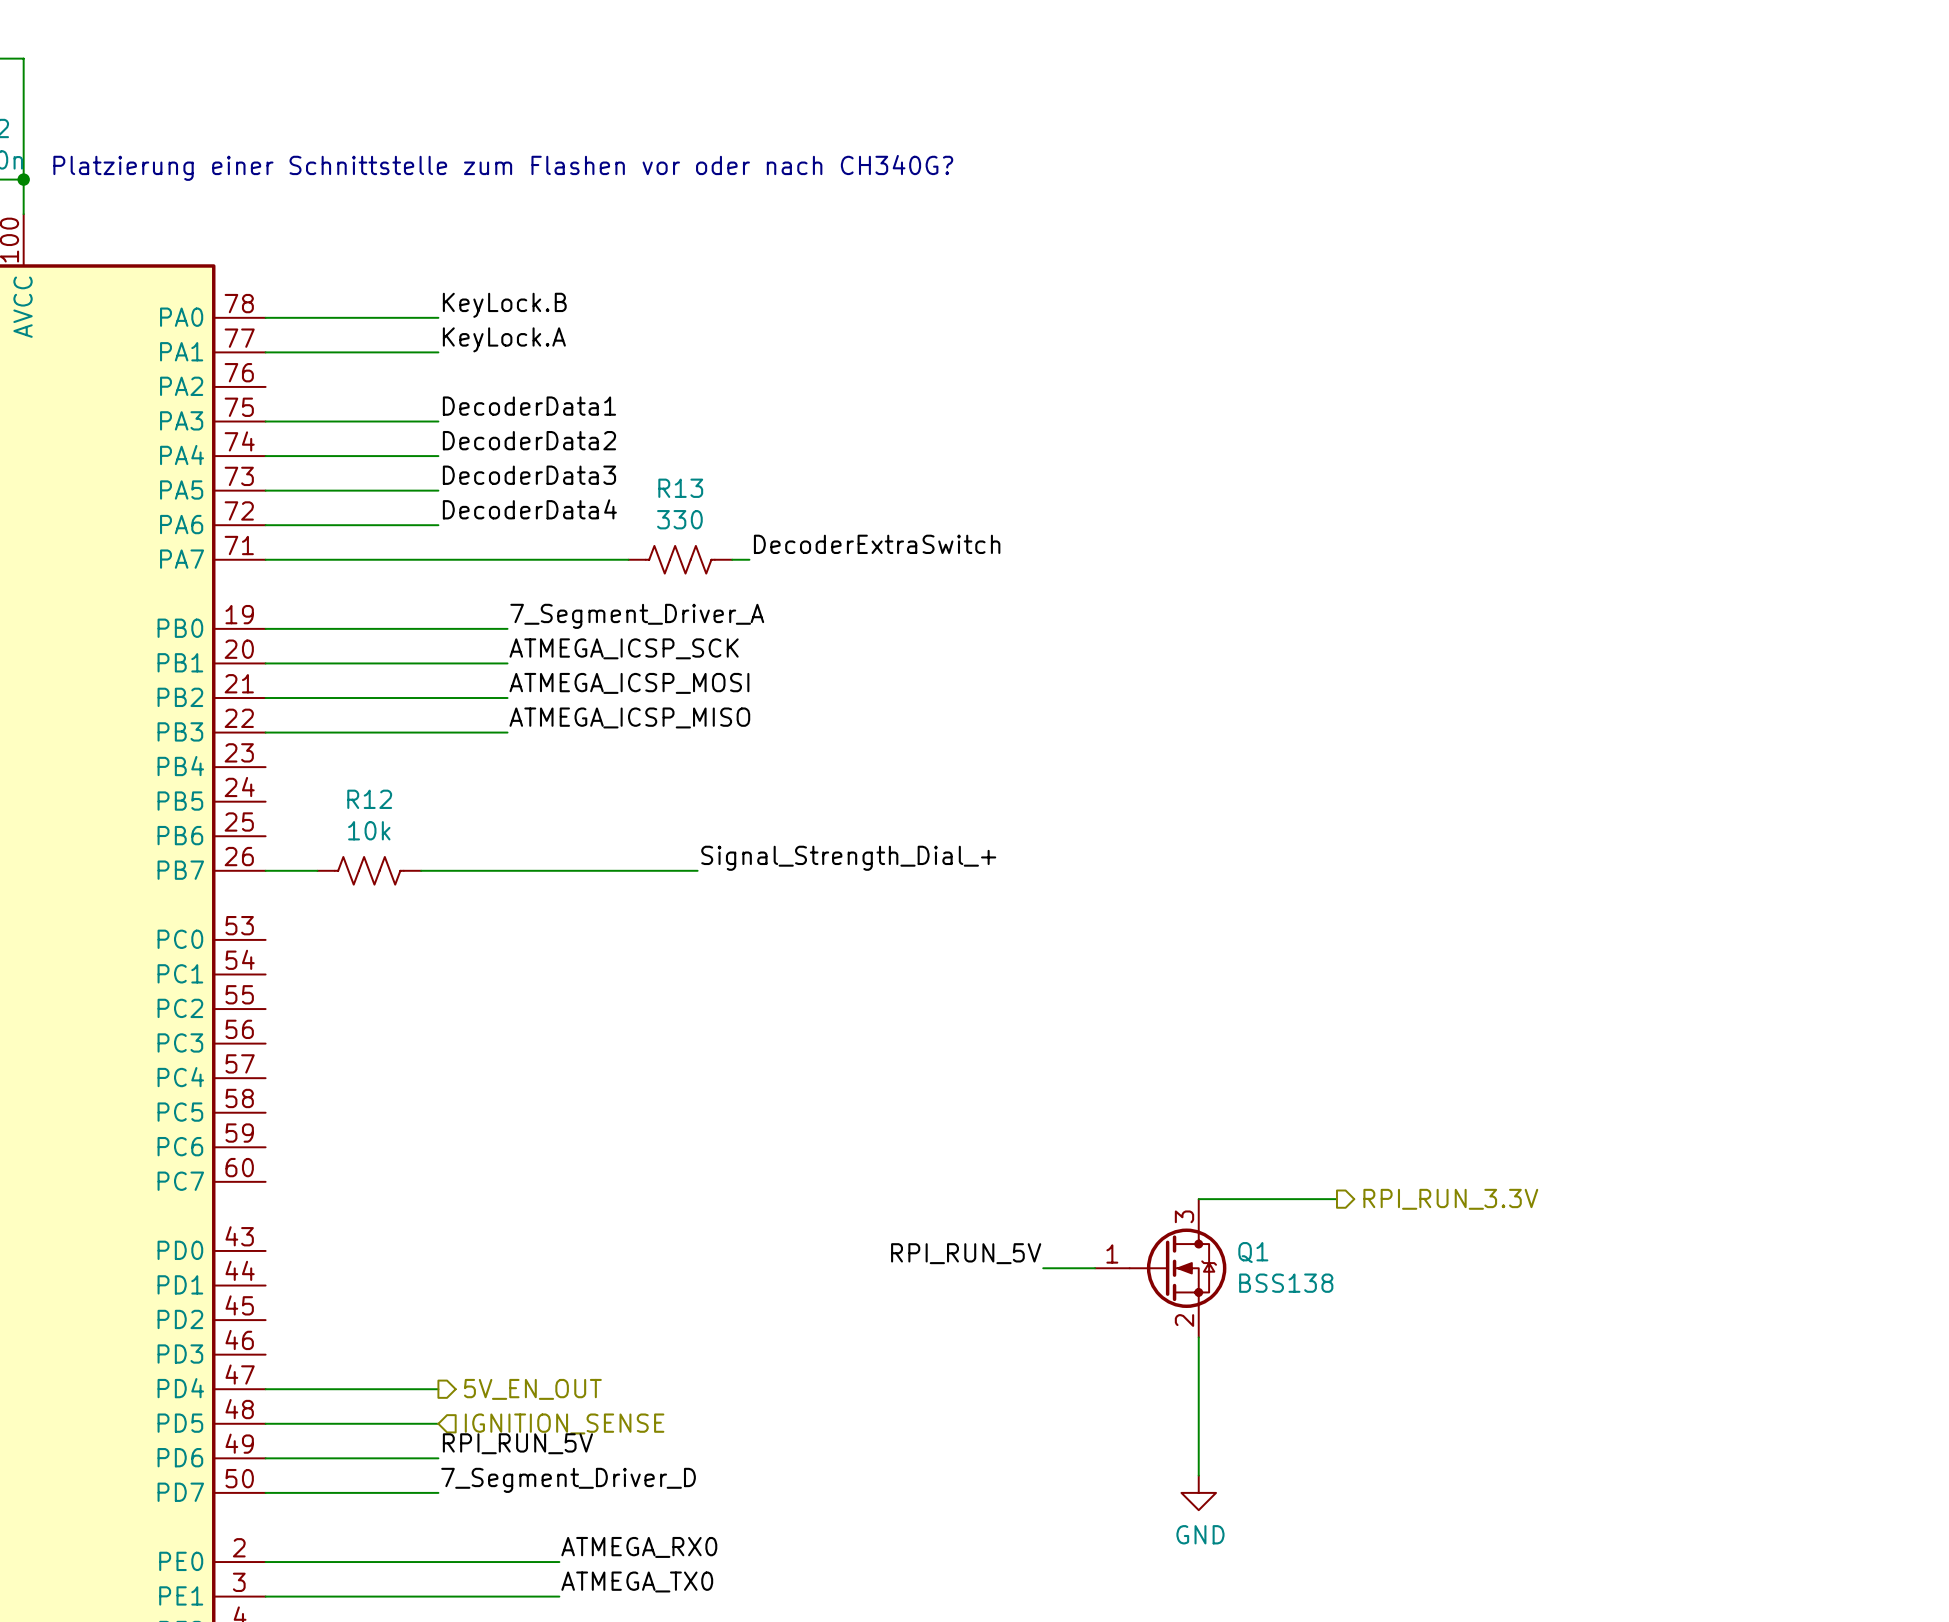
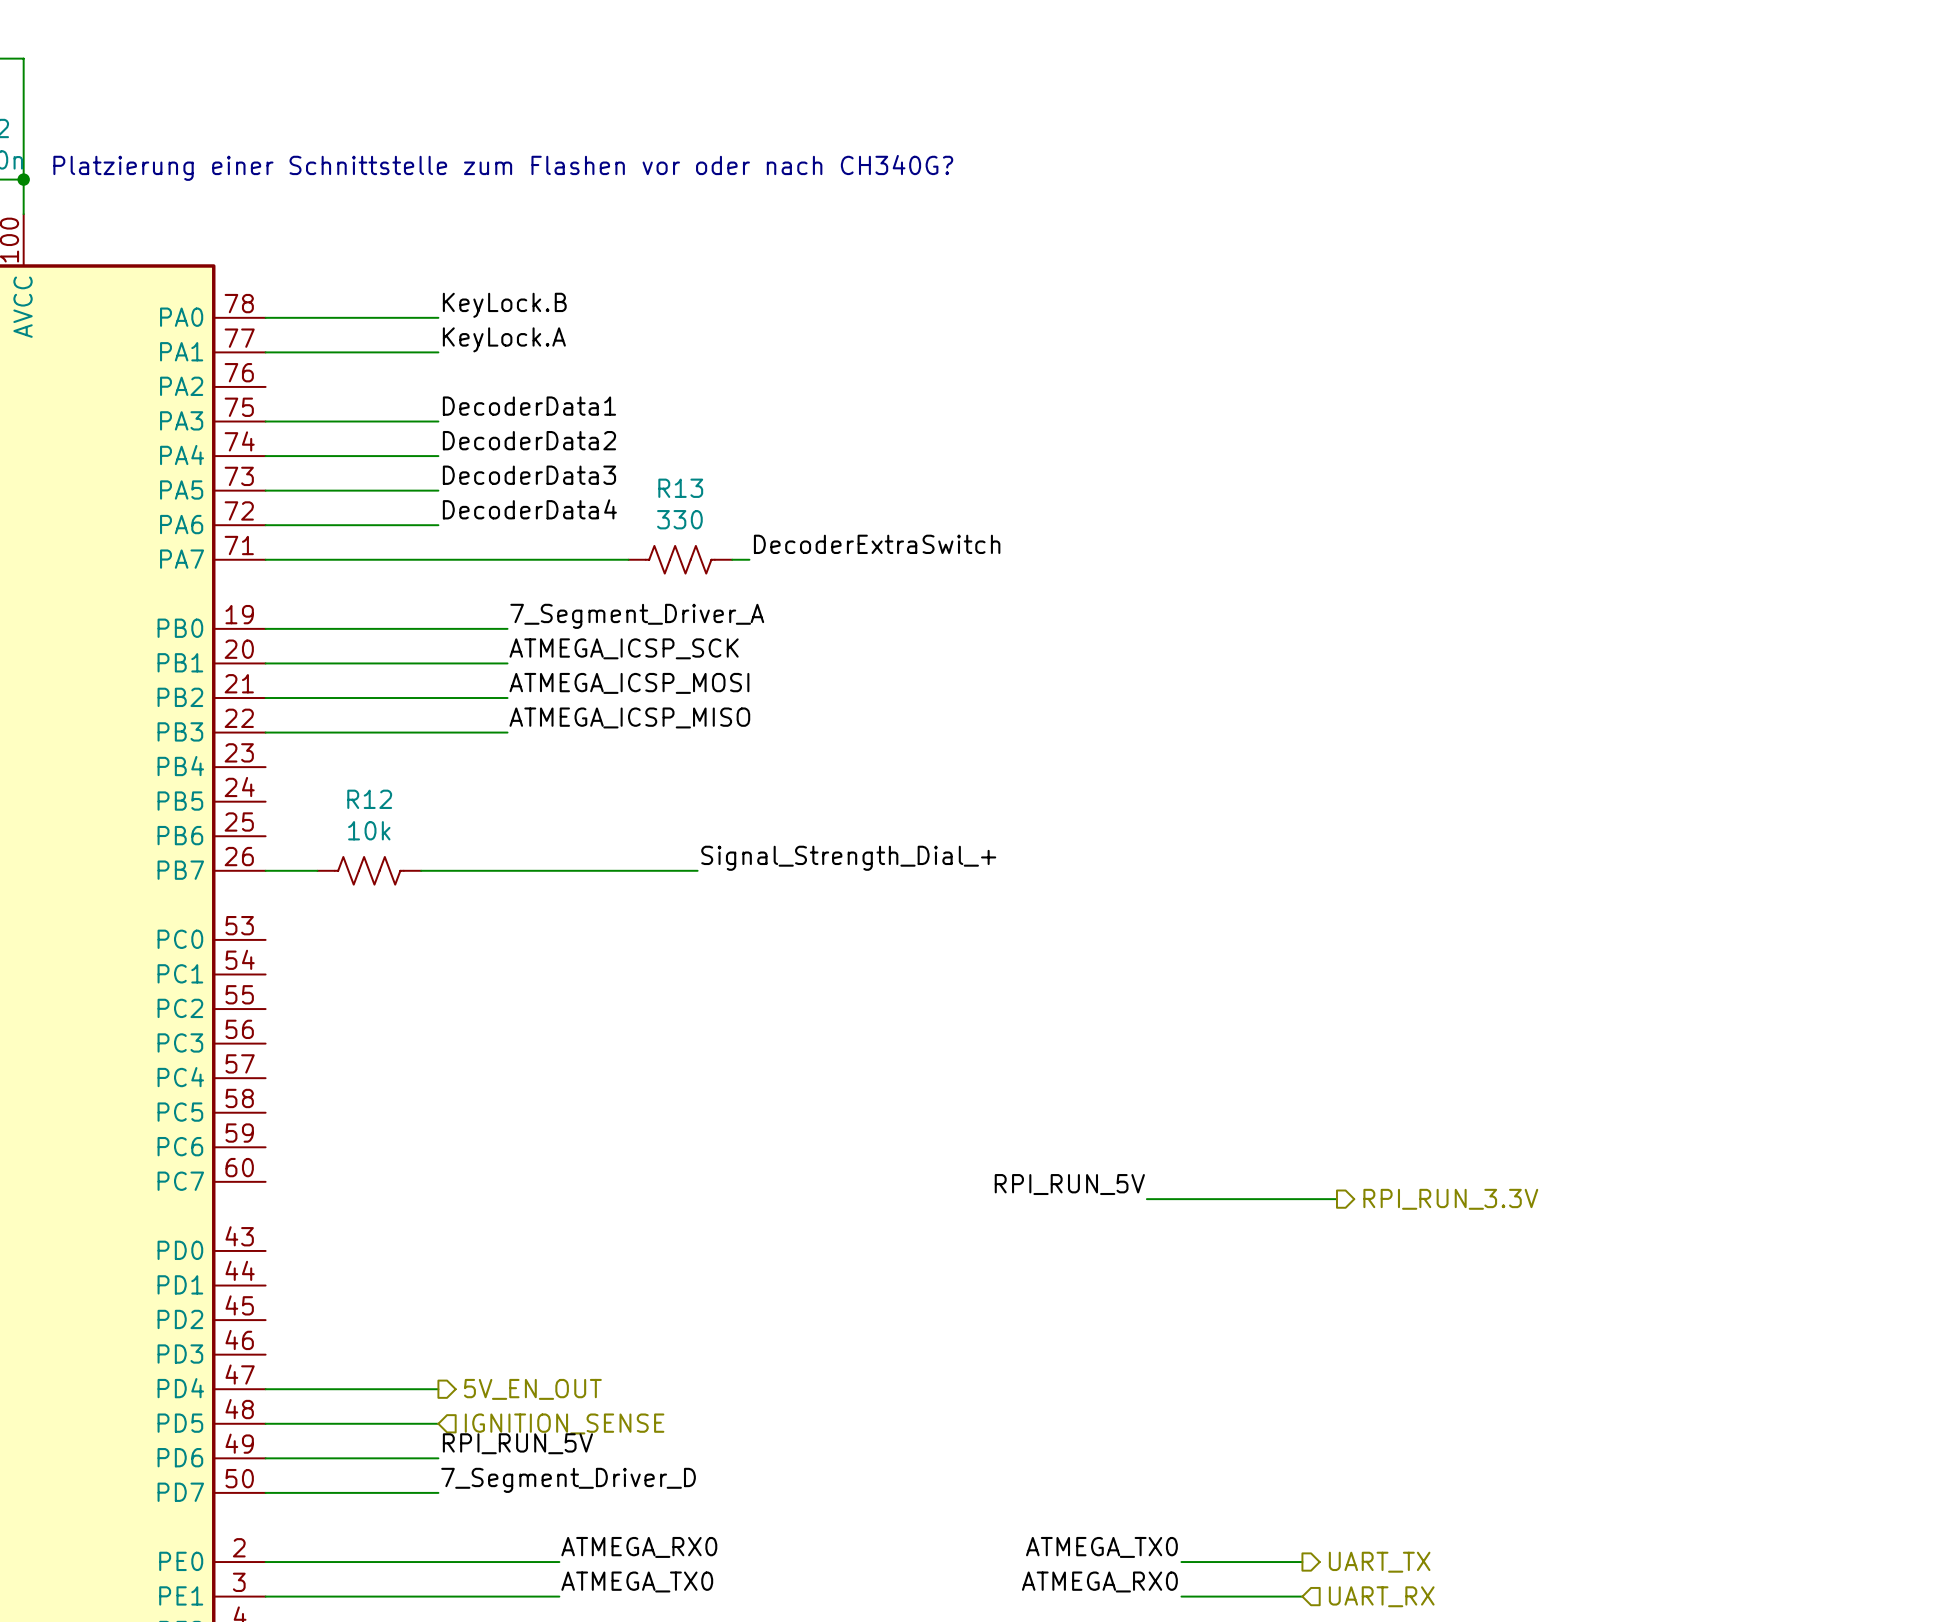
label position: RPI_RUN_5V (966, 1253) -> RPI_RUN_5V (1069, 1184)
wire: (1043, 1268) (1095, 1268) -> (1146, 1199) (1198, 1199)
Q1: BSS138 (1160, 1268) -> none
wire: (1198, 1337) (1198, 1475) -> none
power symbol: GND (1198, 1492) -> none
label: none -> ATMEGA_TX0 (1101, 1547)
wire: none -> (1181, 1562) (1302, 1562)
hierarchical label: none -> UART_TX (1379, 1562)
label: none -> ATMEGA_RX0 (1099, 1581)
wire: none -> (1181, 1596) (1302, 1596)
hierarchical label: none -> UART_RX (1381, 1596)

